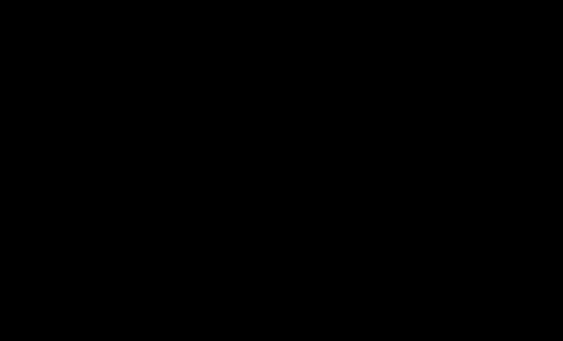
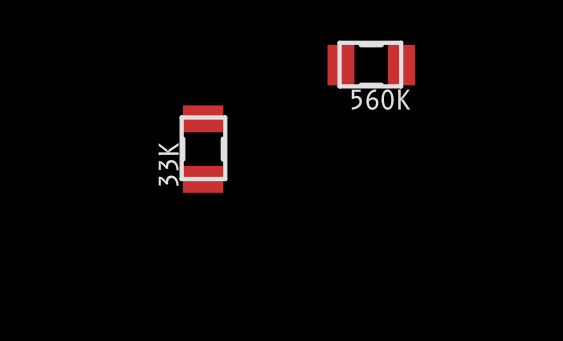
part: none -> 560K (371, 64)
part: none -> 33K (203, 149)

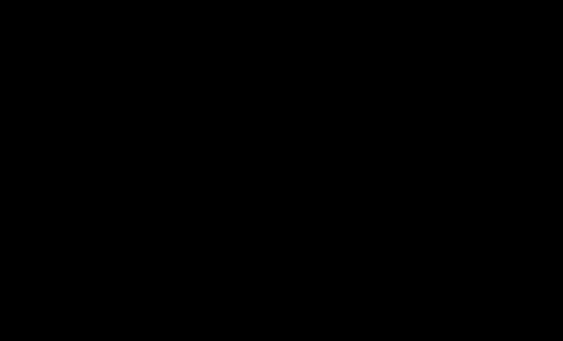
part: 560K (371, 64) -> none
part: 33K (203, 149) -> none

